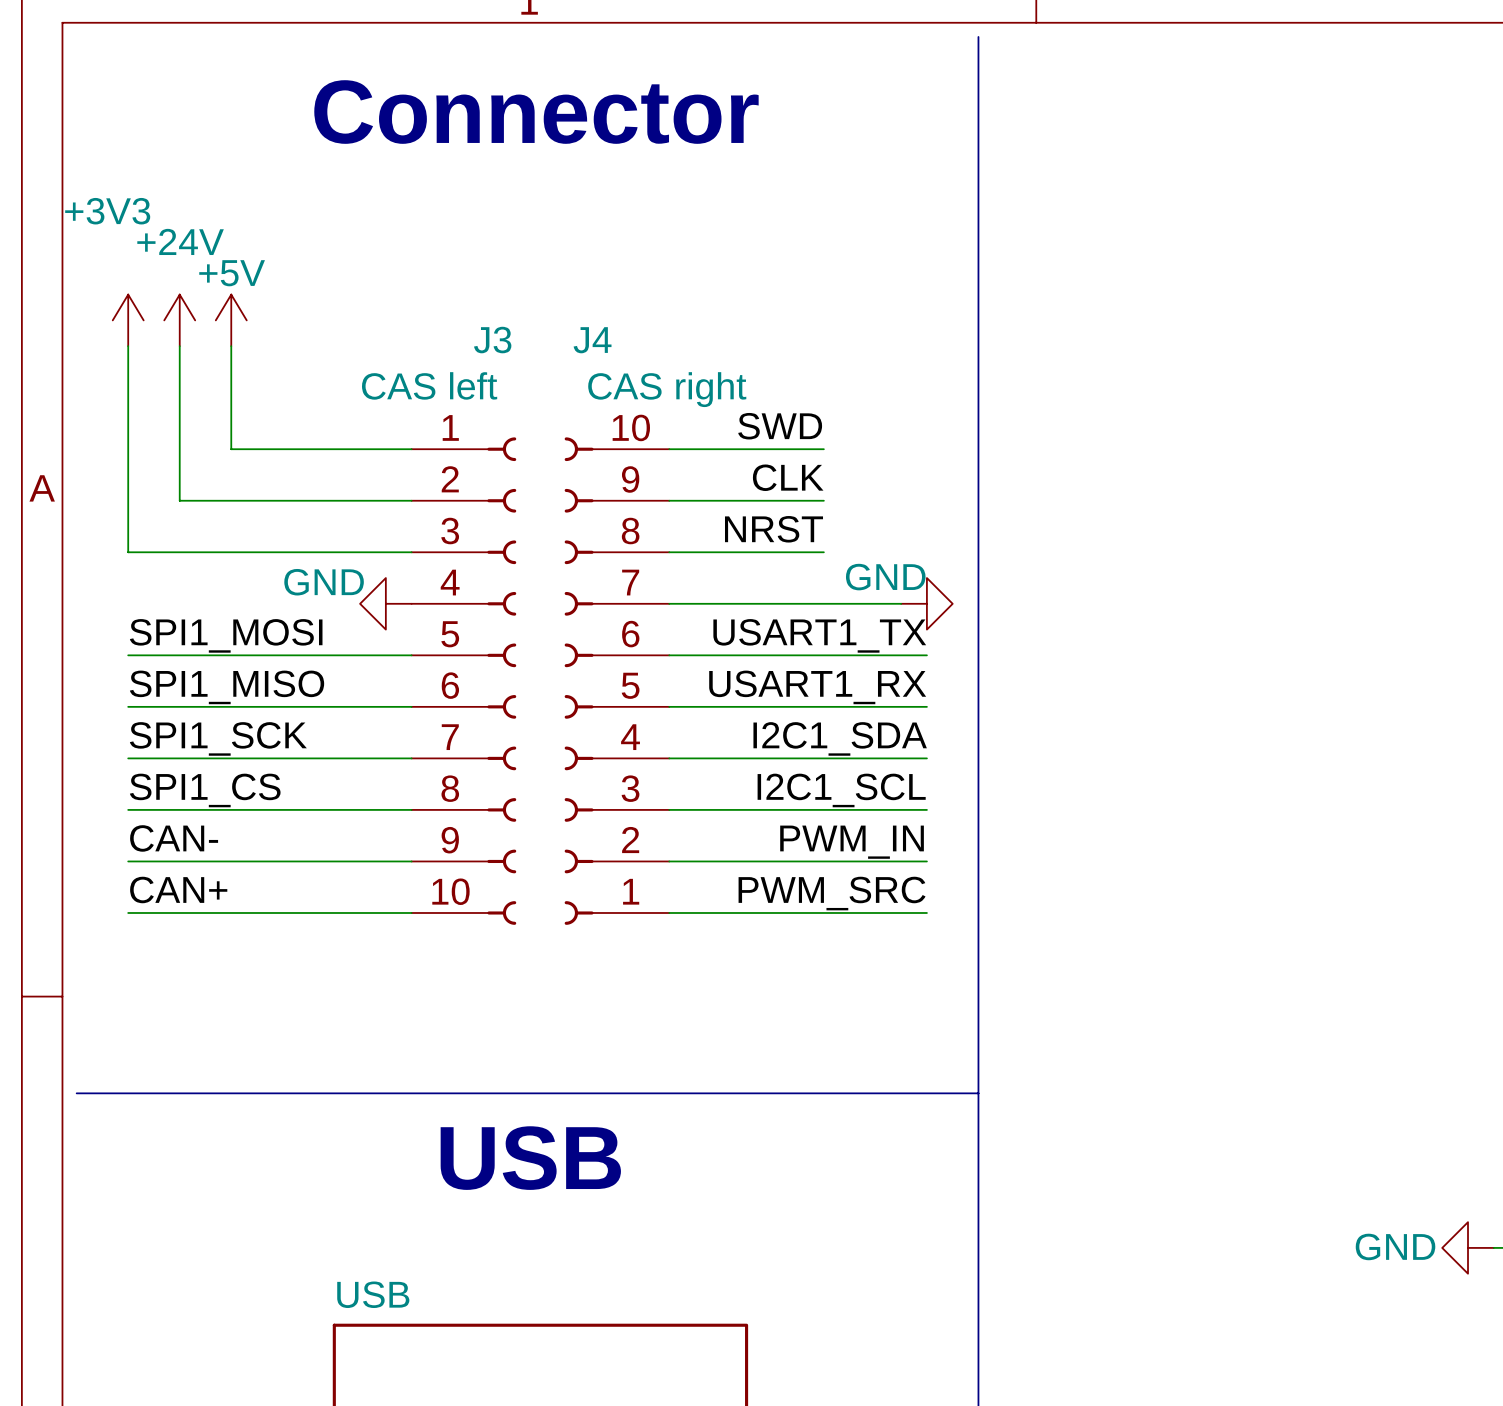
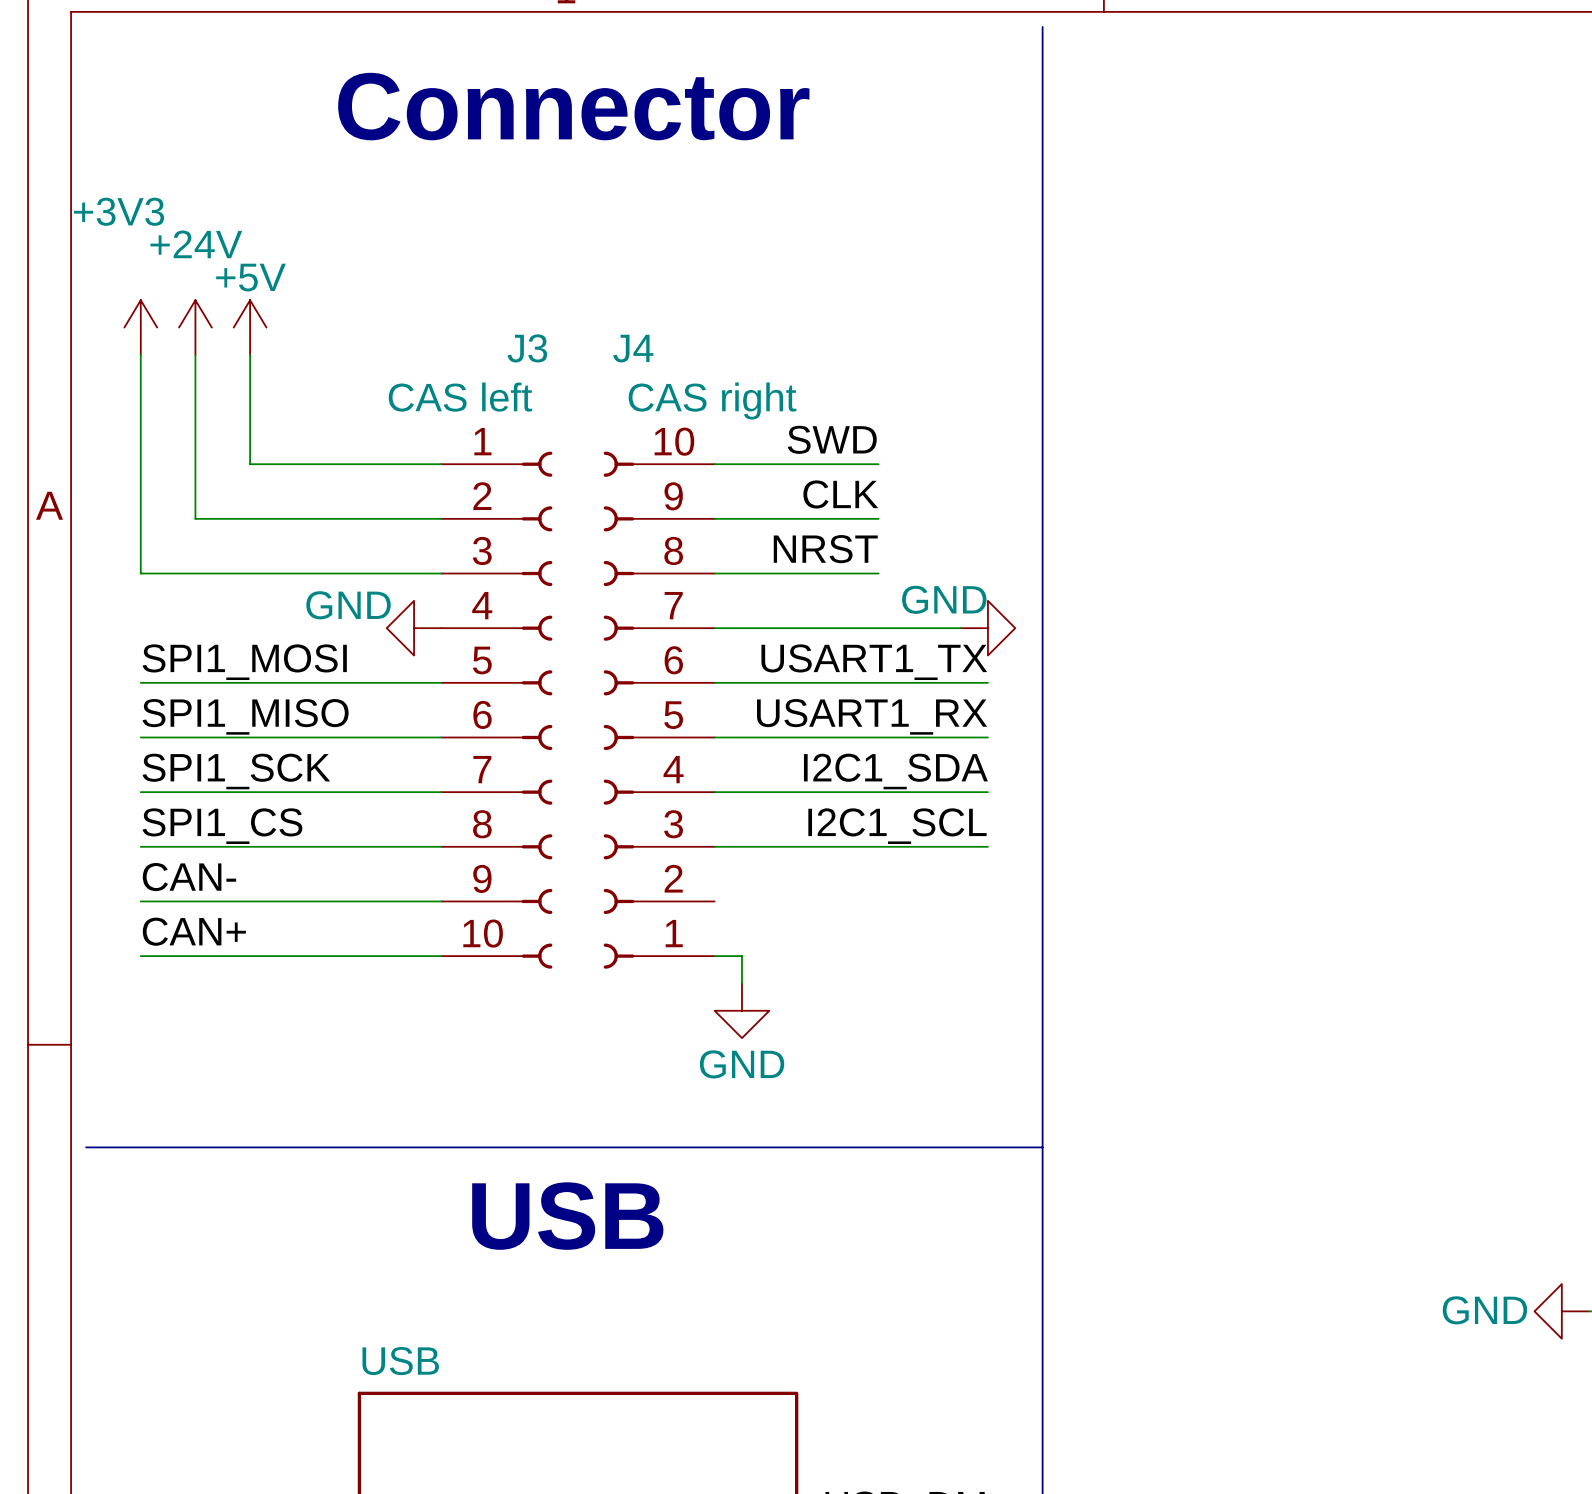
label: PWM_IN (852, 842) -> none
wire: (669, 861) (926, 861) -> none
label: PWM_SRC (832, 893) -> none
wire: (695, 912) (926, 912) -> (741, 956) (741, 983)
power symbol: none -> GND (741, 1010)

